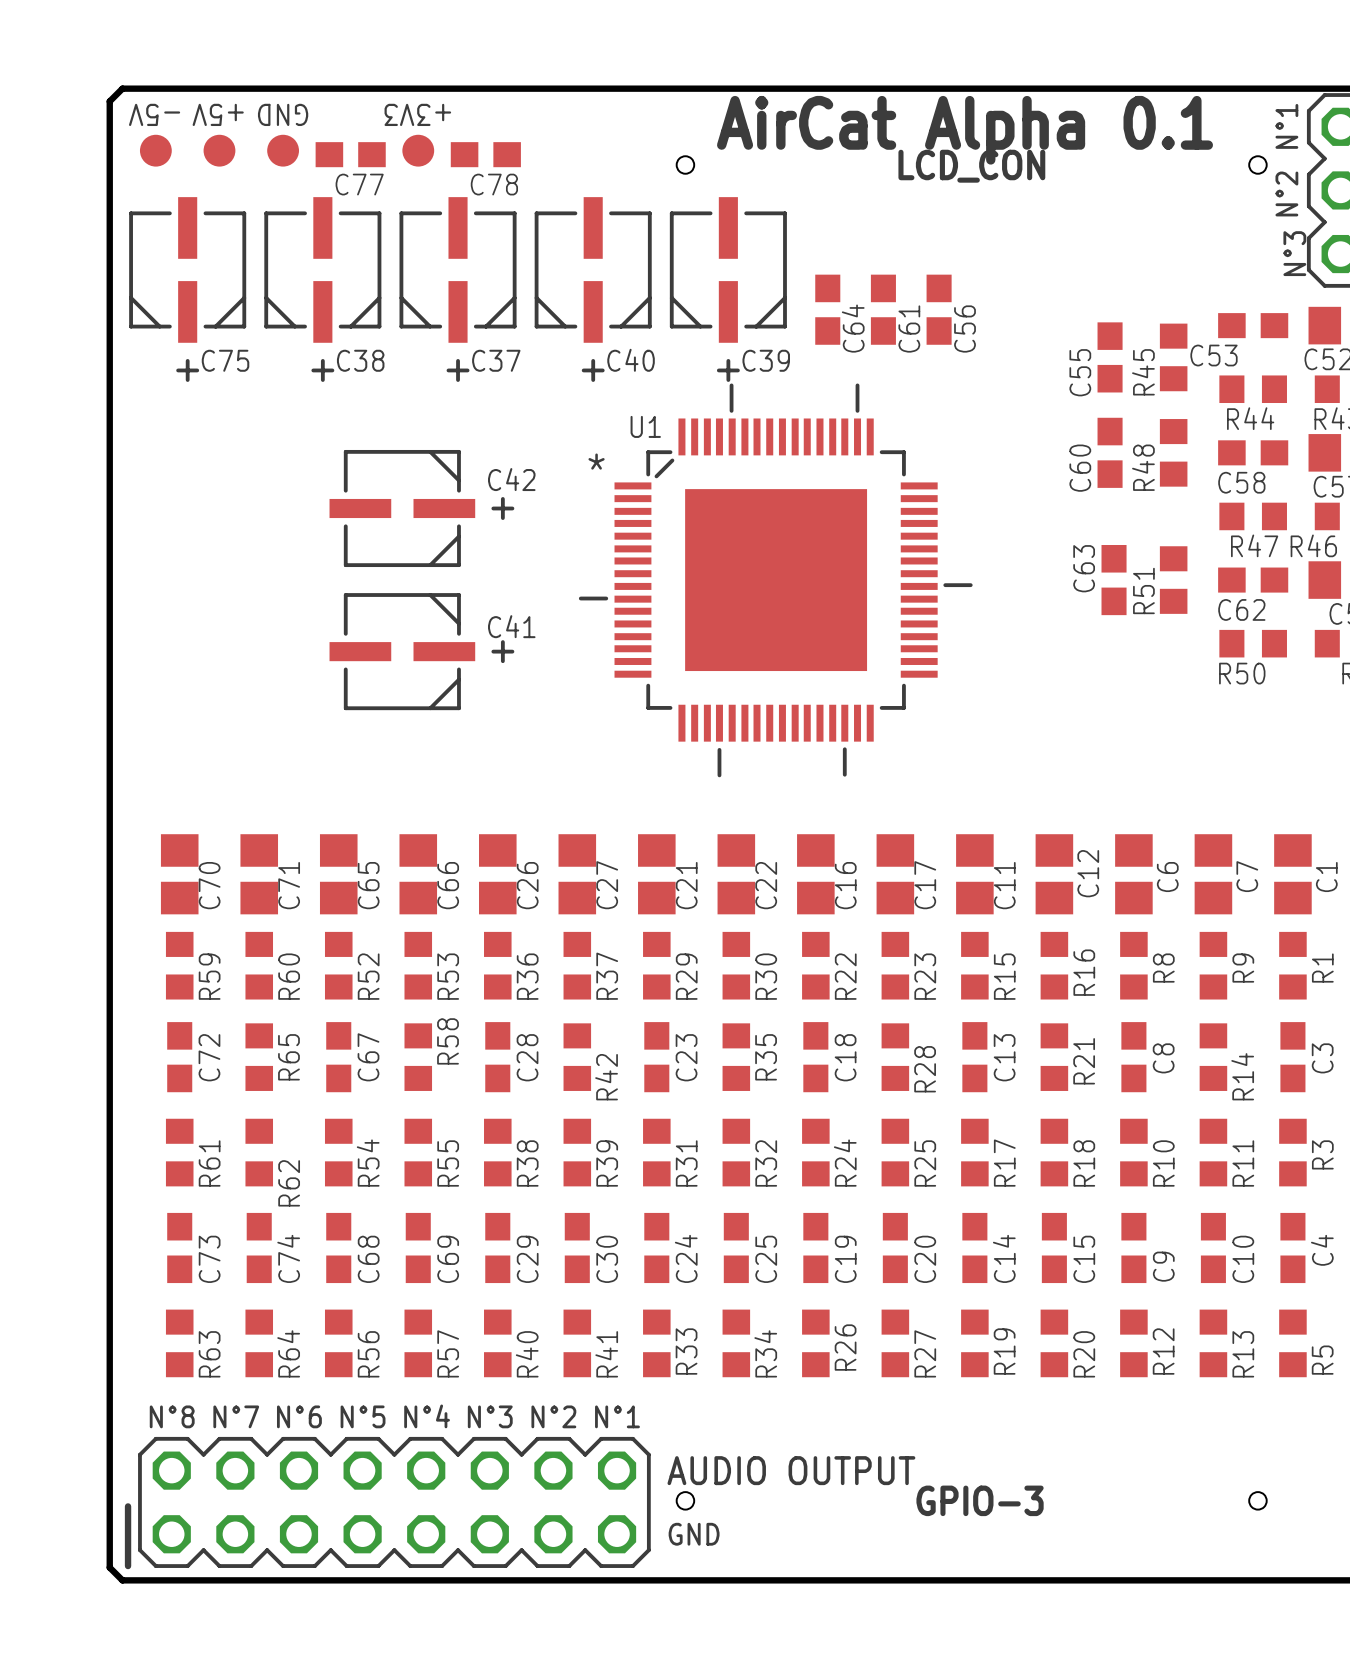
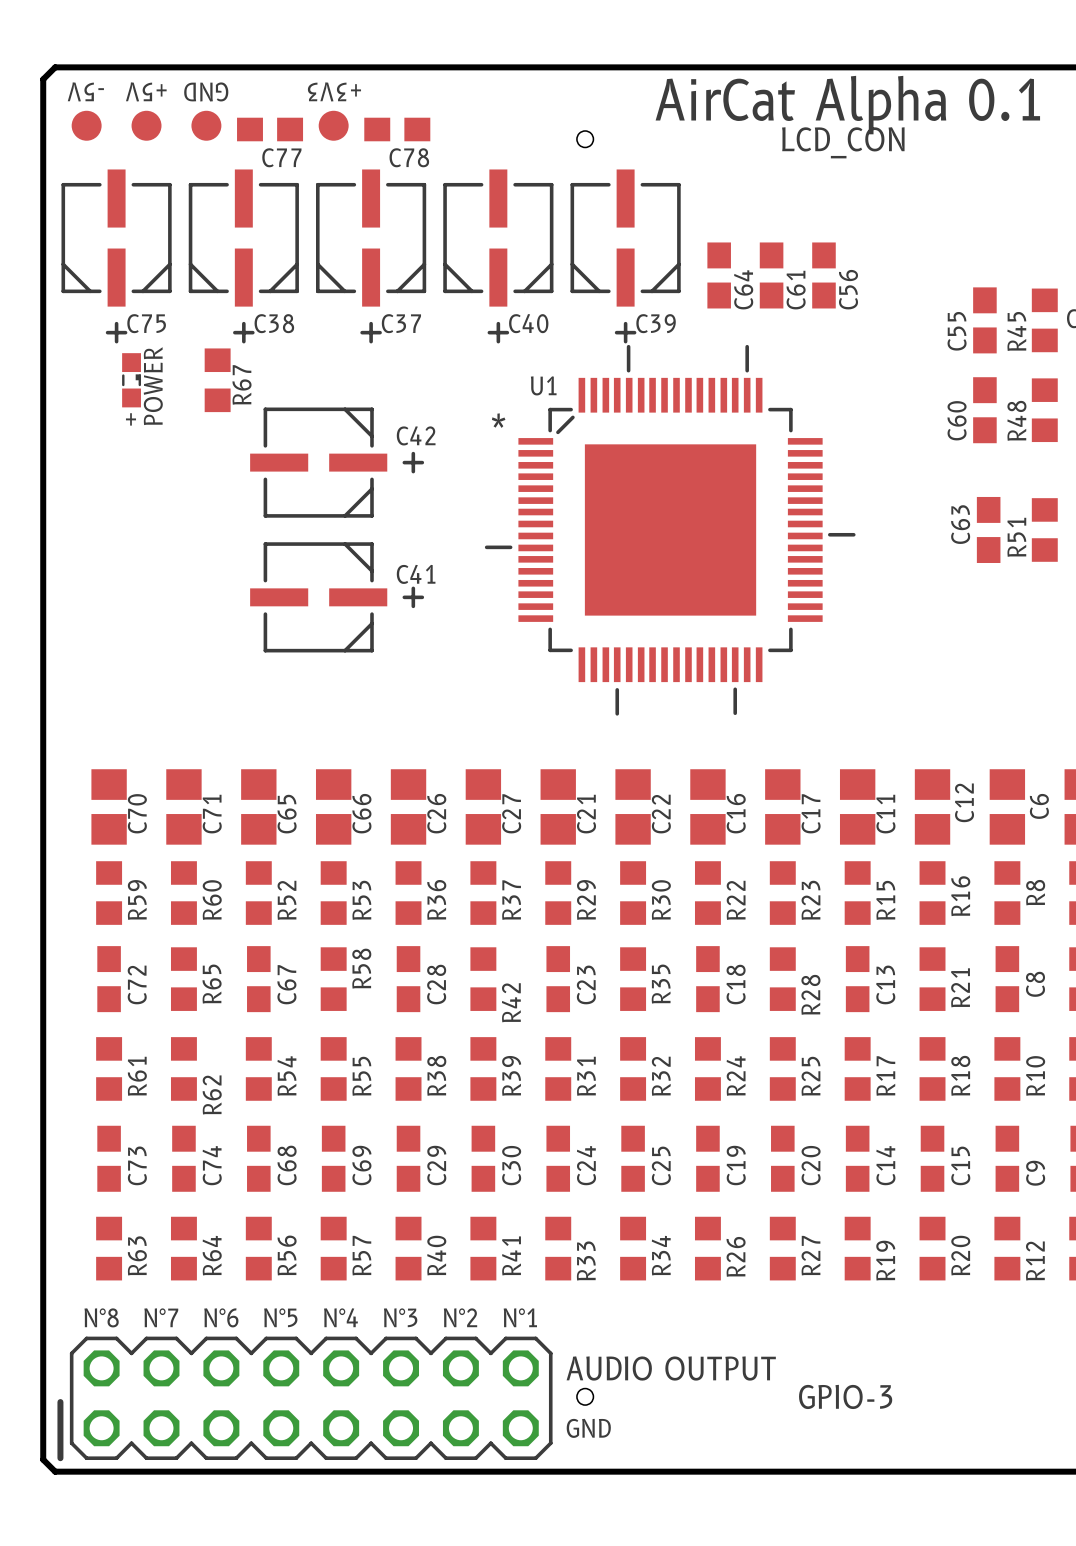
POWER: none -> (131, 380)
R67: none -> (217, 380)
text: none -> + (130, 419)

